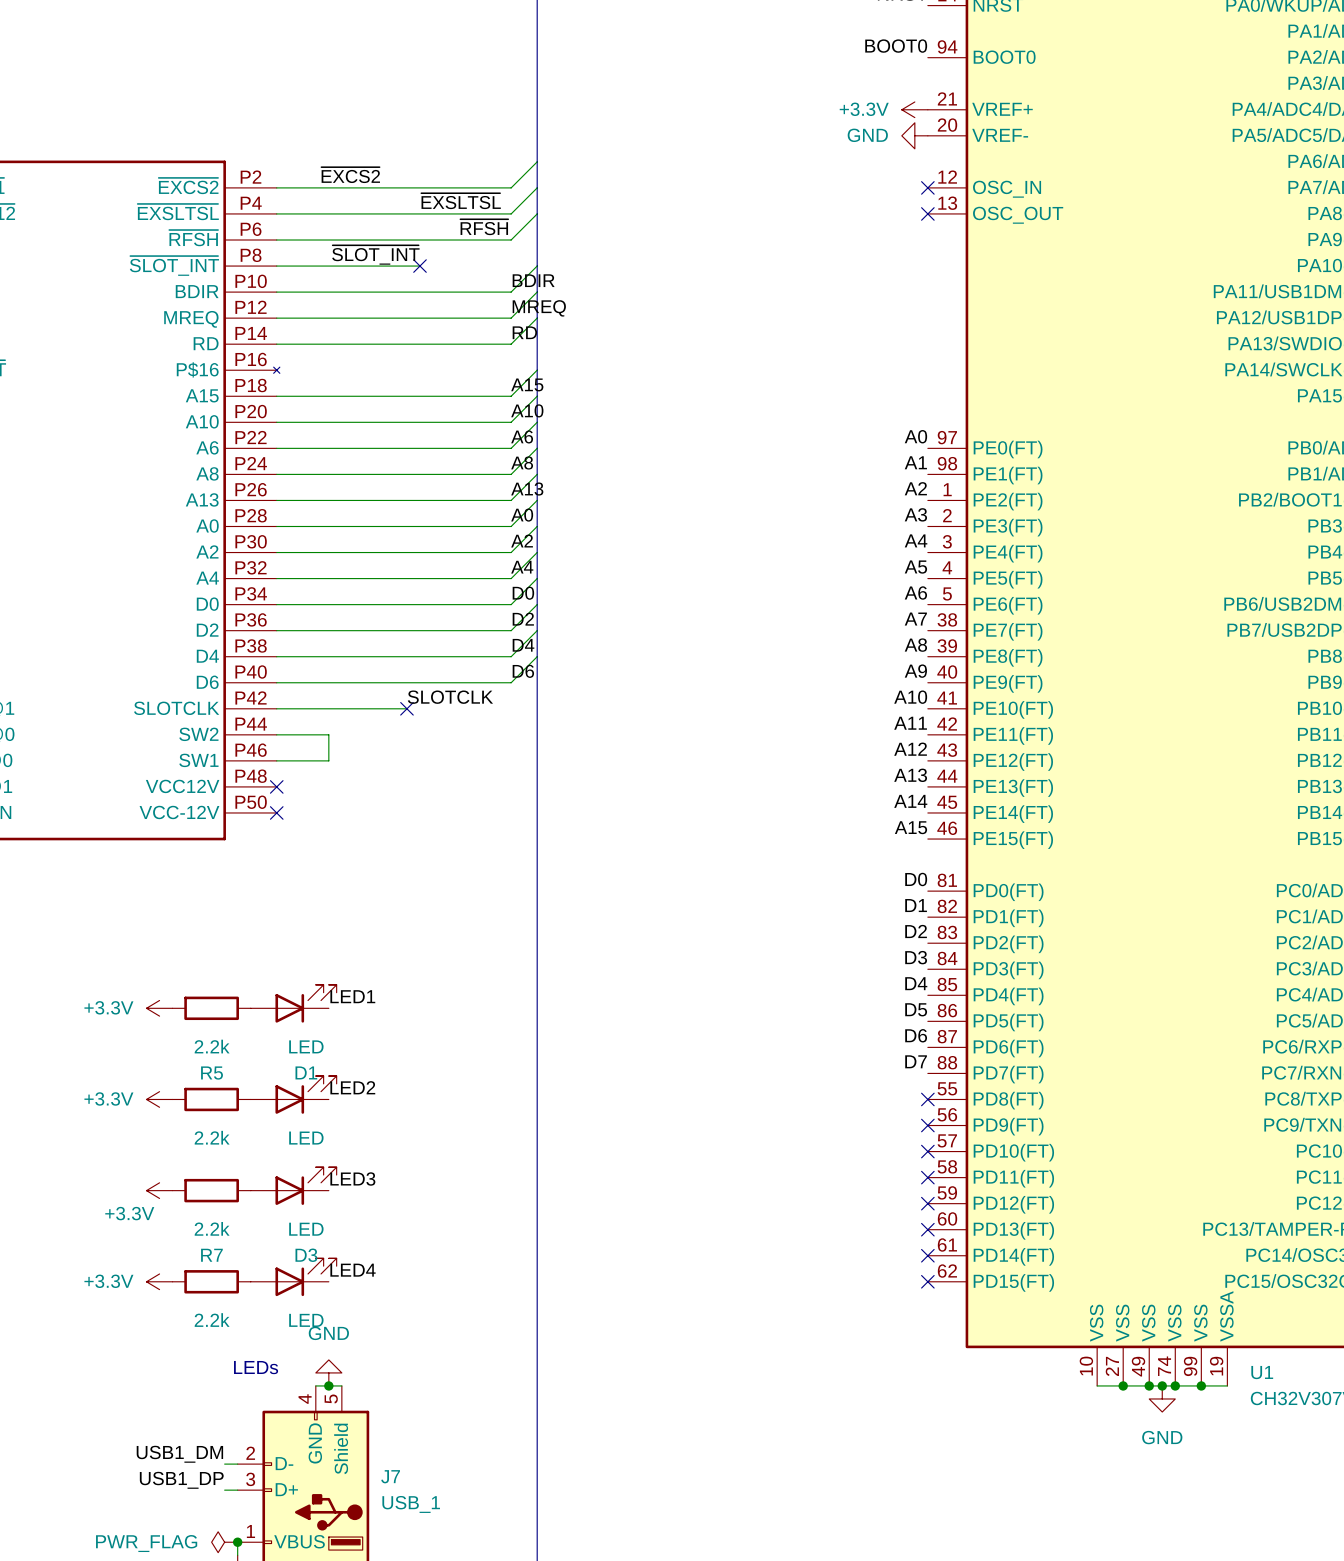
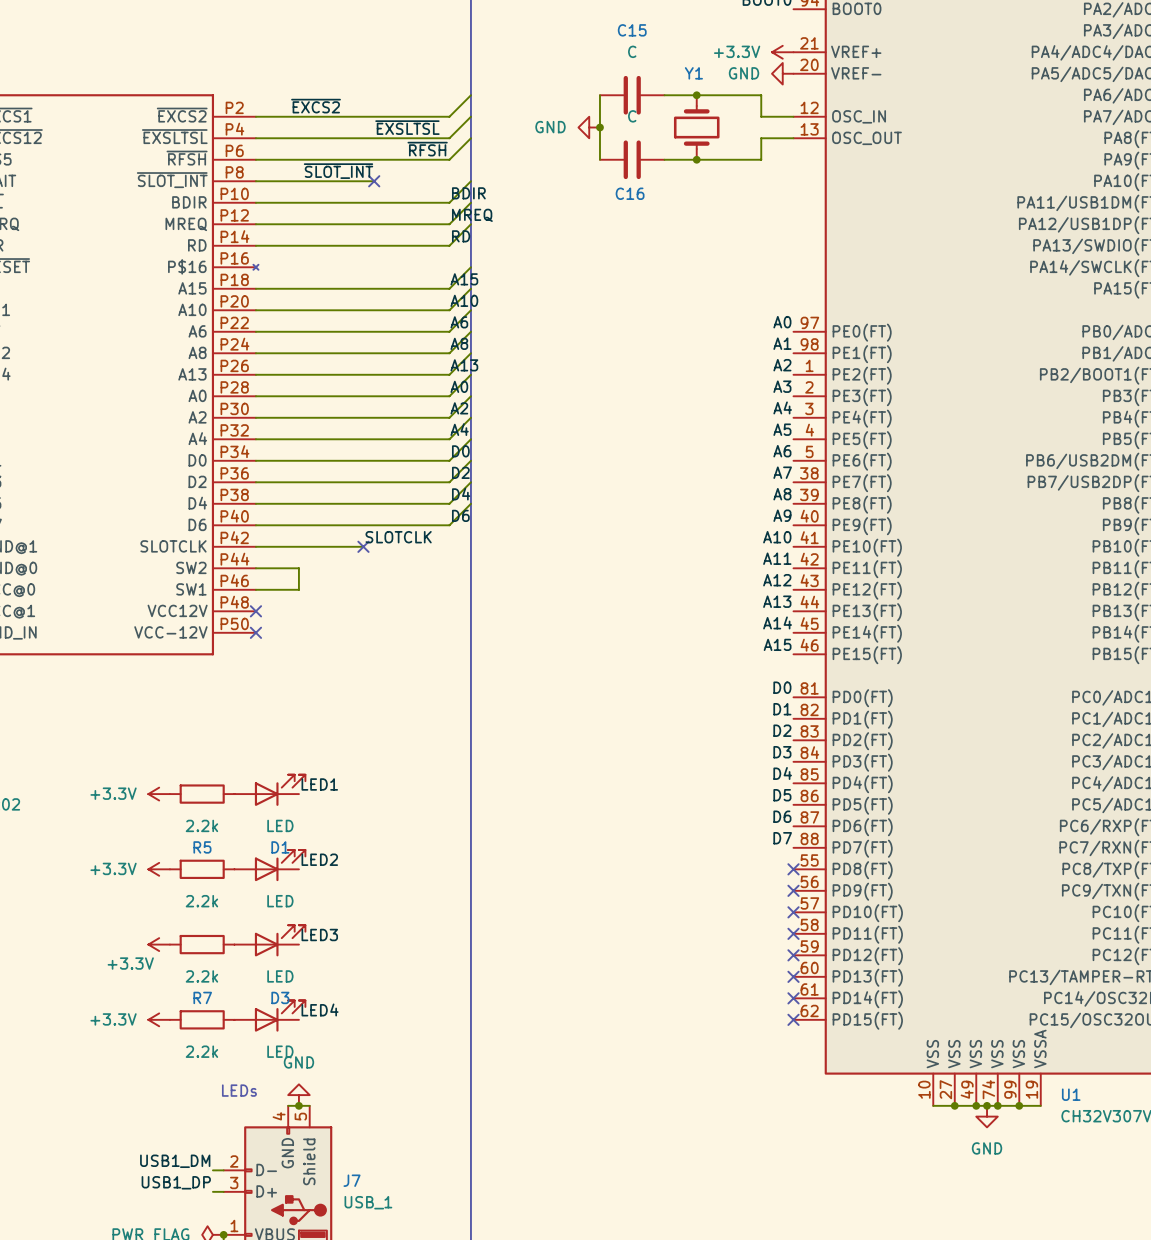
wire: none -> (599, 95) (599, 159)
C15: none -> C (632, 95)
wire: none -> (664, 95) (761, 95) (761, 116) (793, 116)
junction: none -> (696, 95)
no-connect mark: (927, 187) -> none
power symbol: none -> GND (589, 127)
junction: none -> (599, 127)
Y1: none -> (696, 127)
wire: none -> (793, 138) (761, 138) (761, 159) (664, 159)
no-connect mark: (927, 213) -> none
C16: none -> C (632, 159)
junction: none -> (696, 159)

